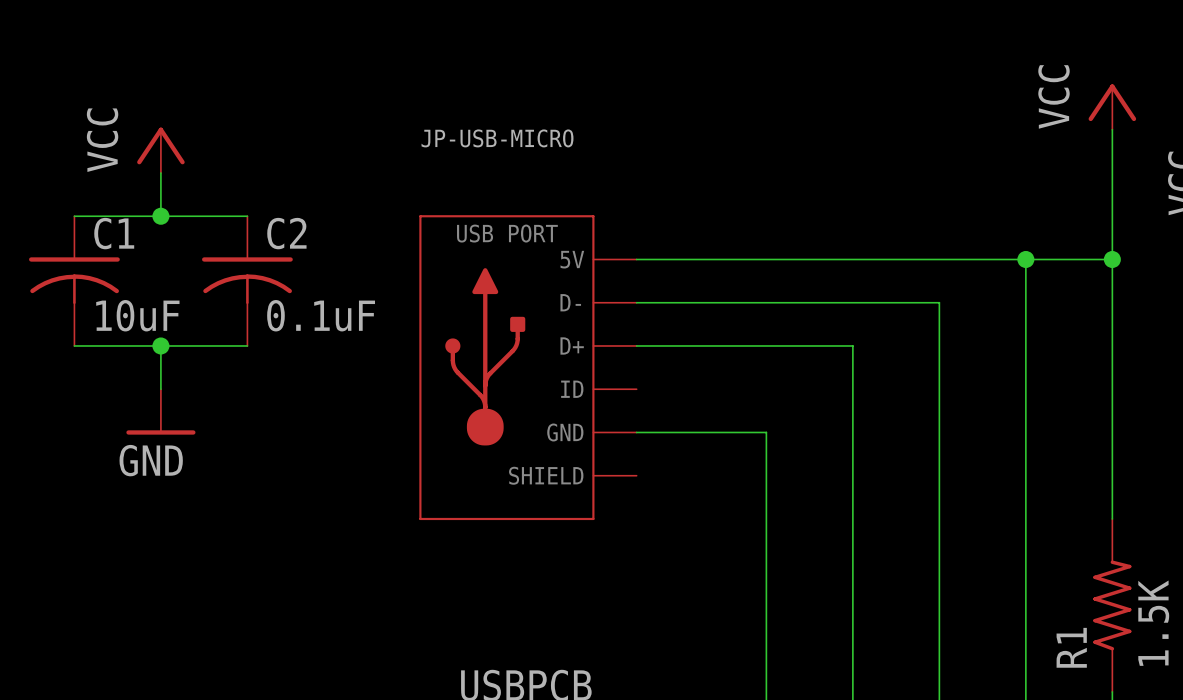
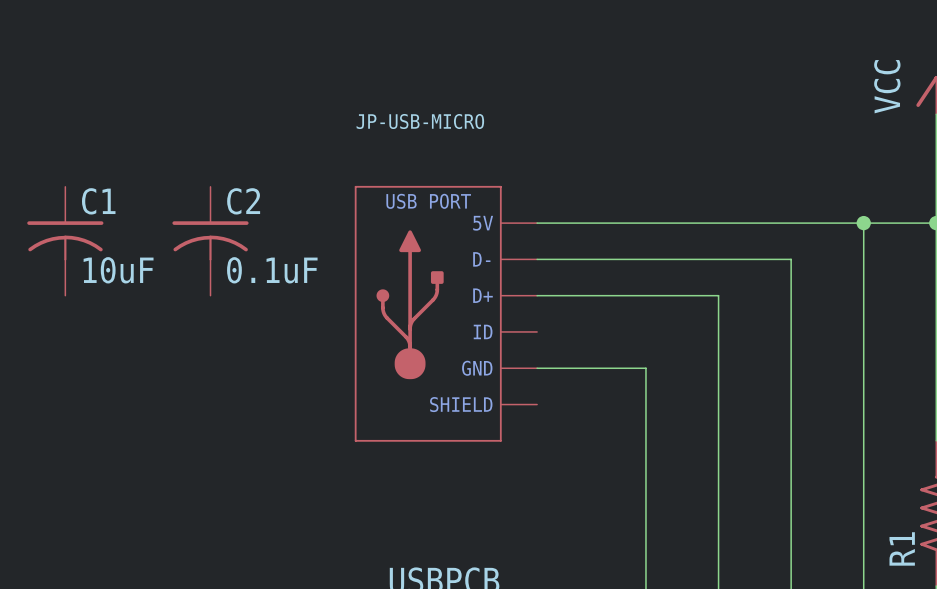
power symbol: VCC (160, 150) -> none
wire: (160, 173) (160, 216) -> none
wire: (74, 216) (247, 216) -> none
junction: (160, 216) -> none
wire: (74, 345) (247, 345) -> none
wire: (160, 345) (160, 389) -> none
junction: (160, 345) -> none
power symbol: GND (160, 411) -> none

